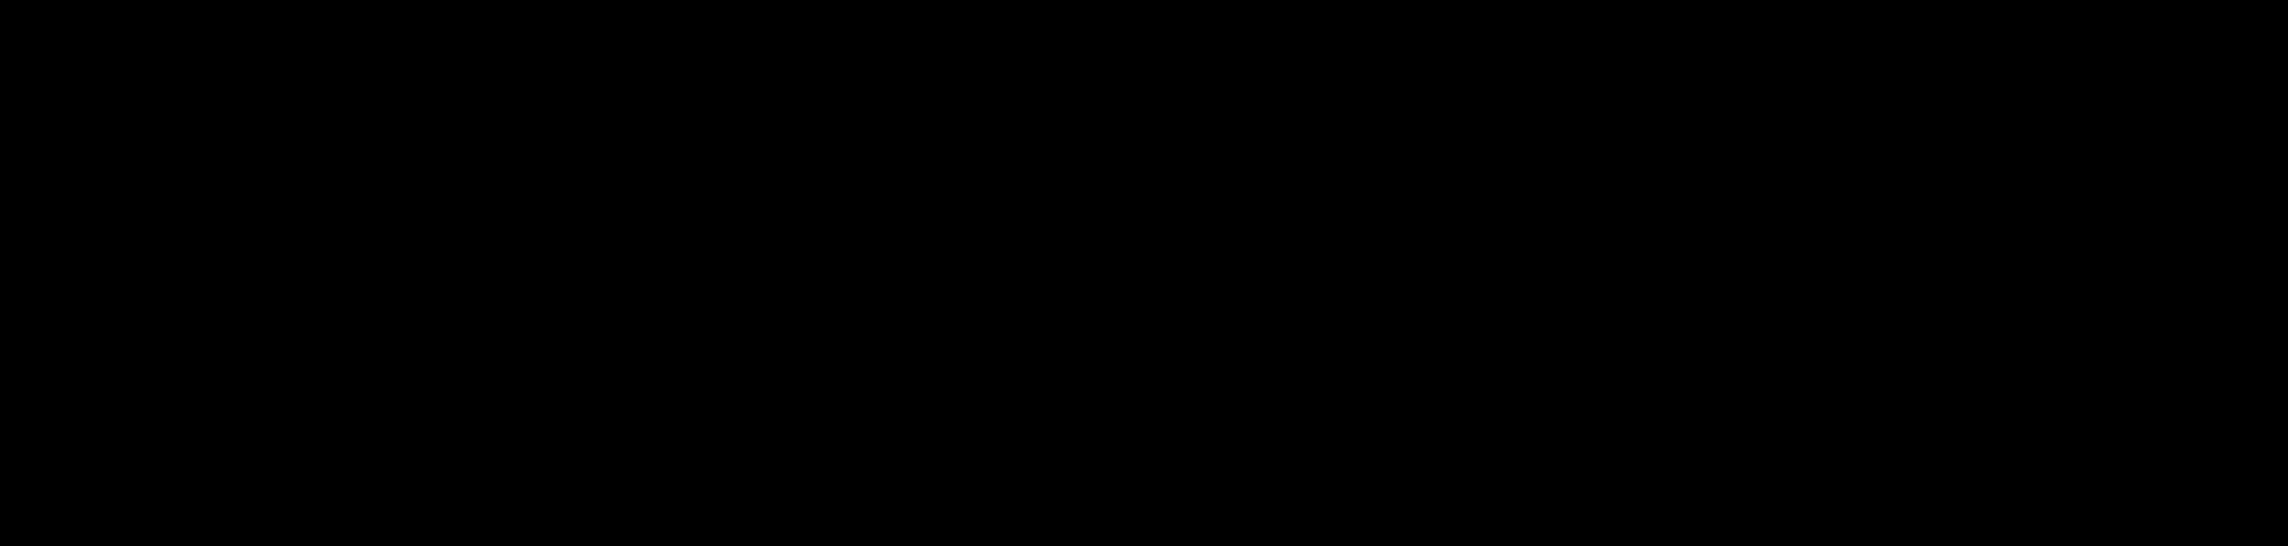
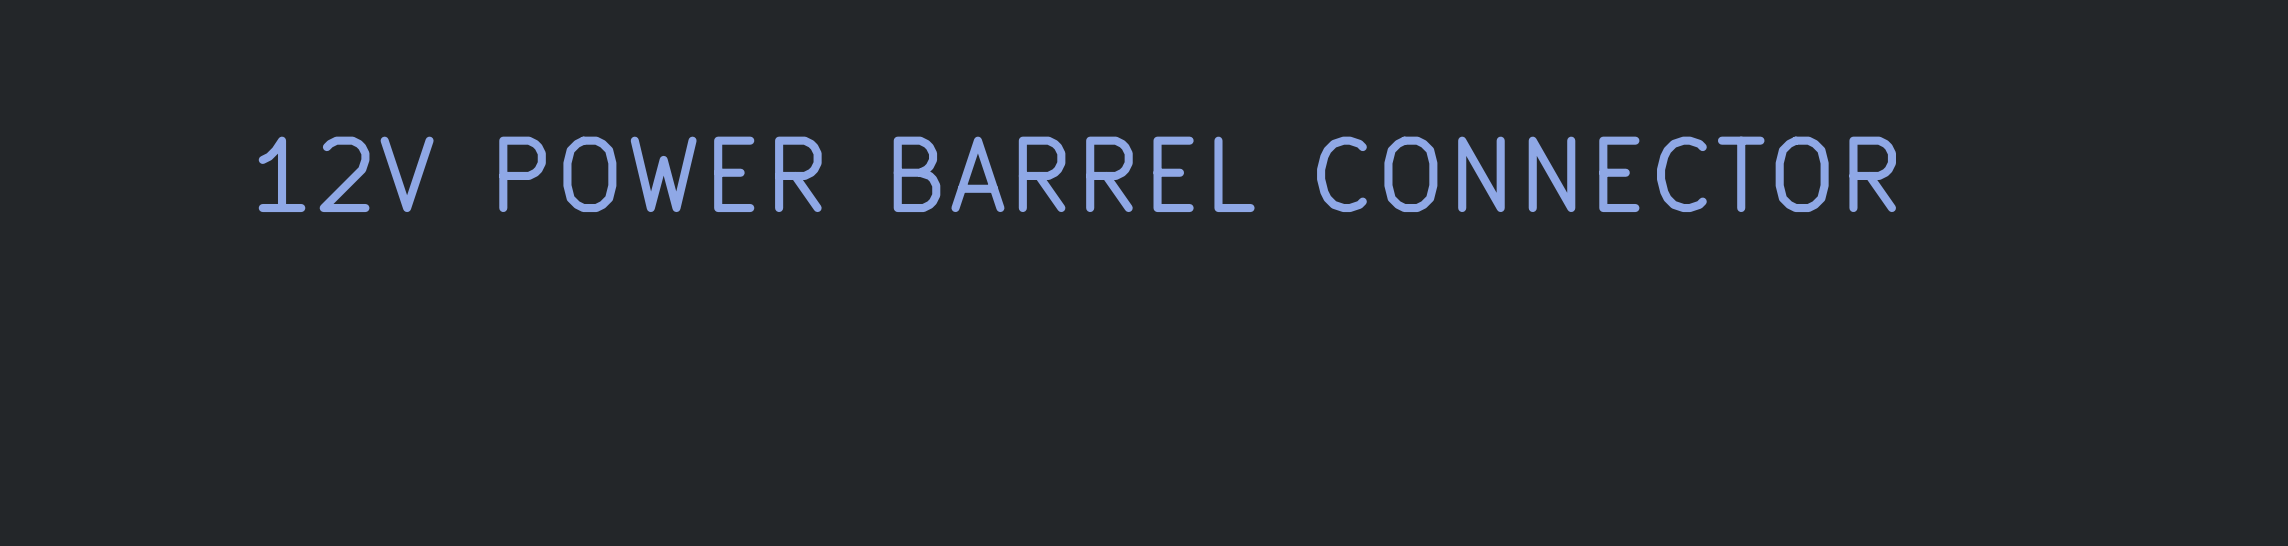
text: none -> 12V POWER BARREL CONNECTOR (1077, 174)

